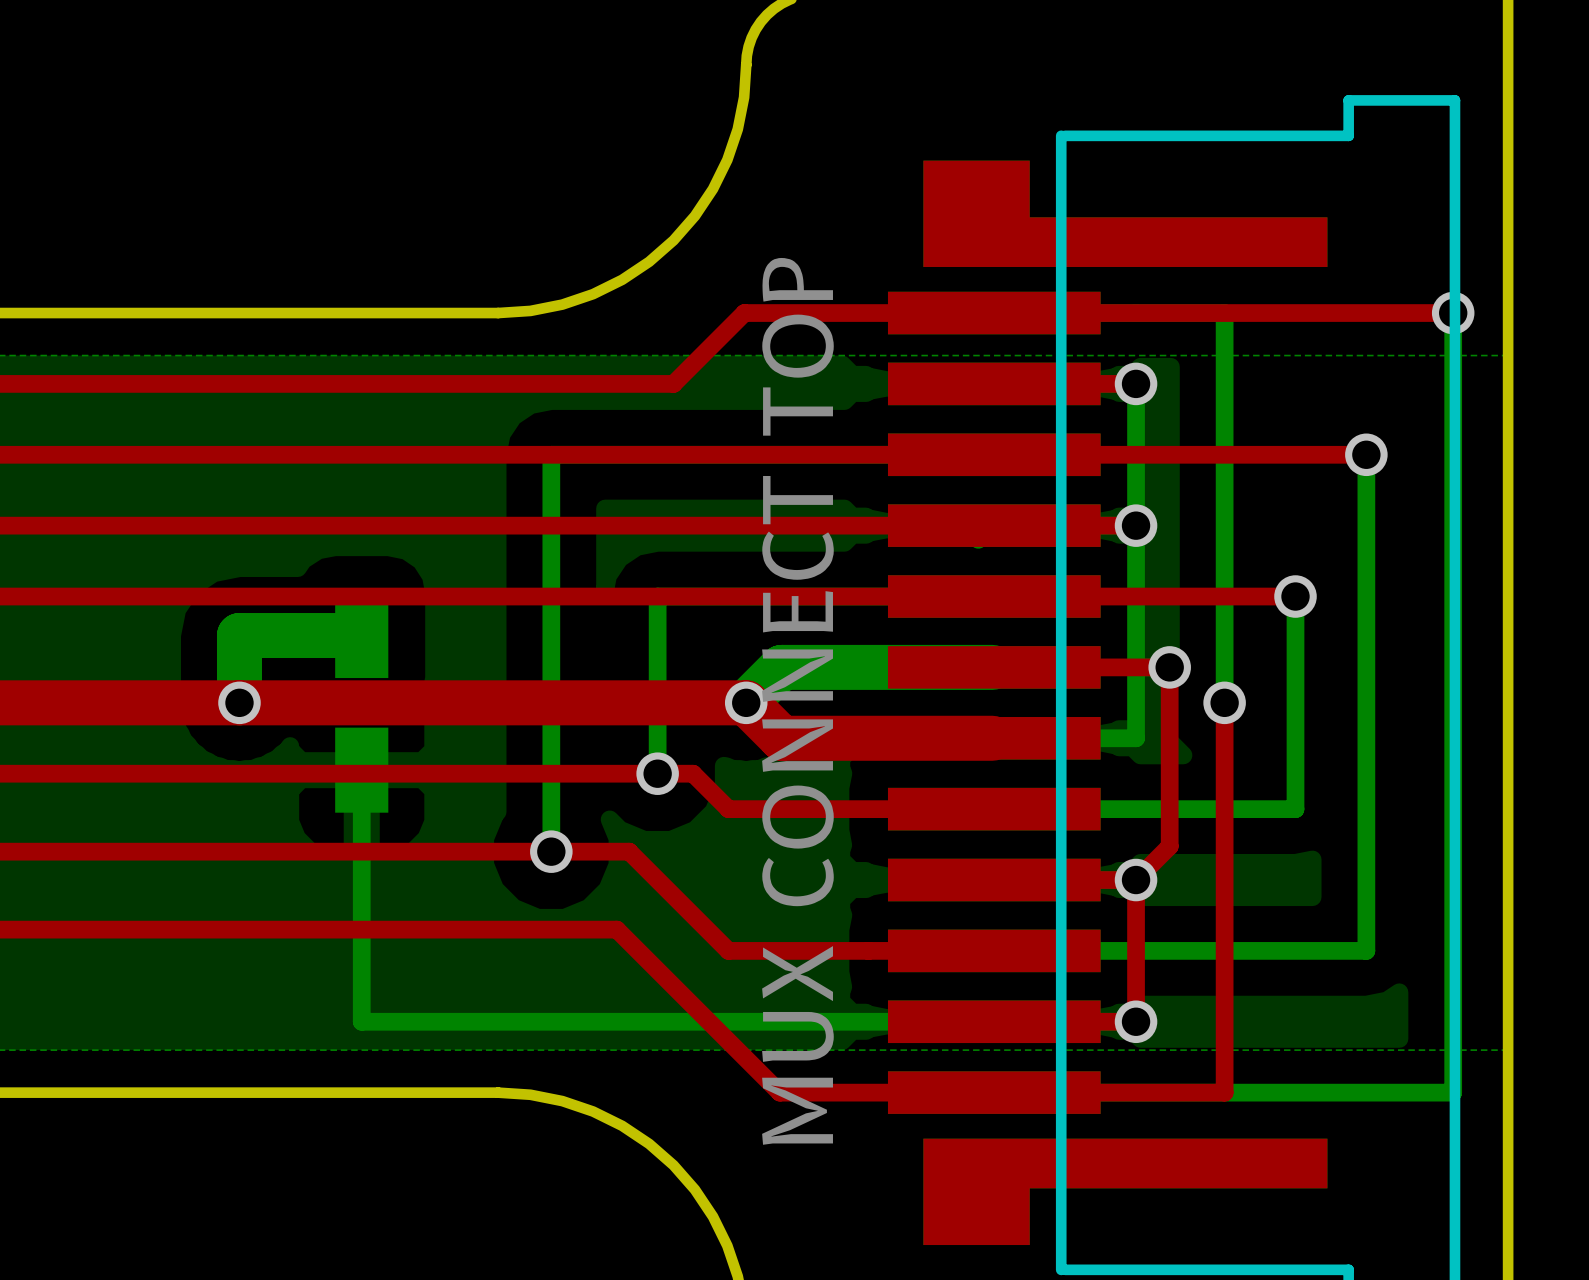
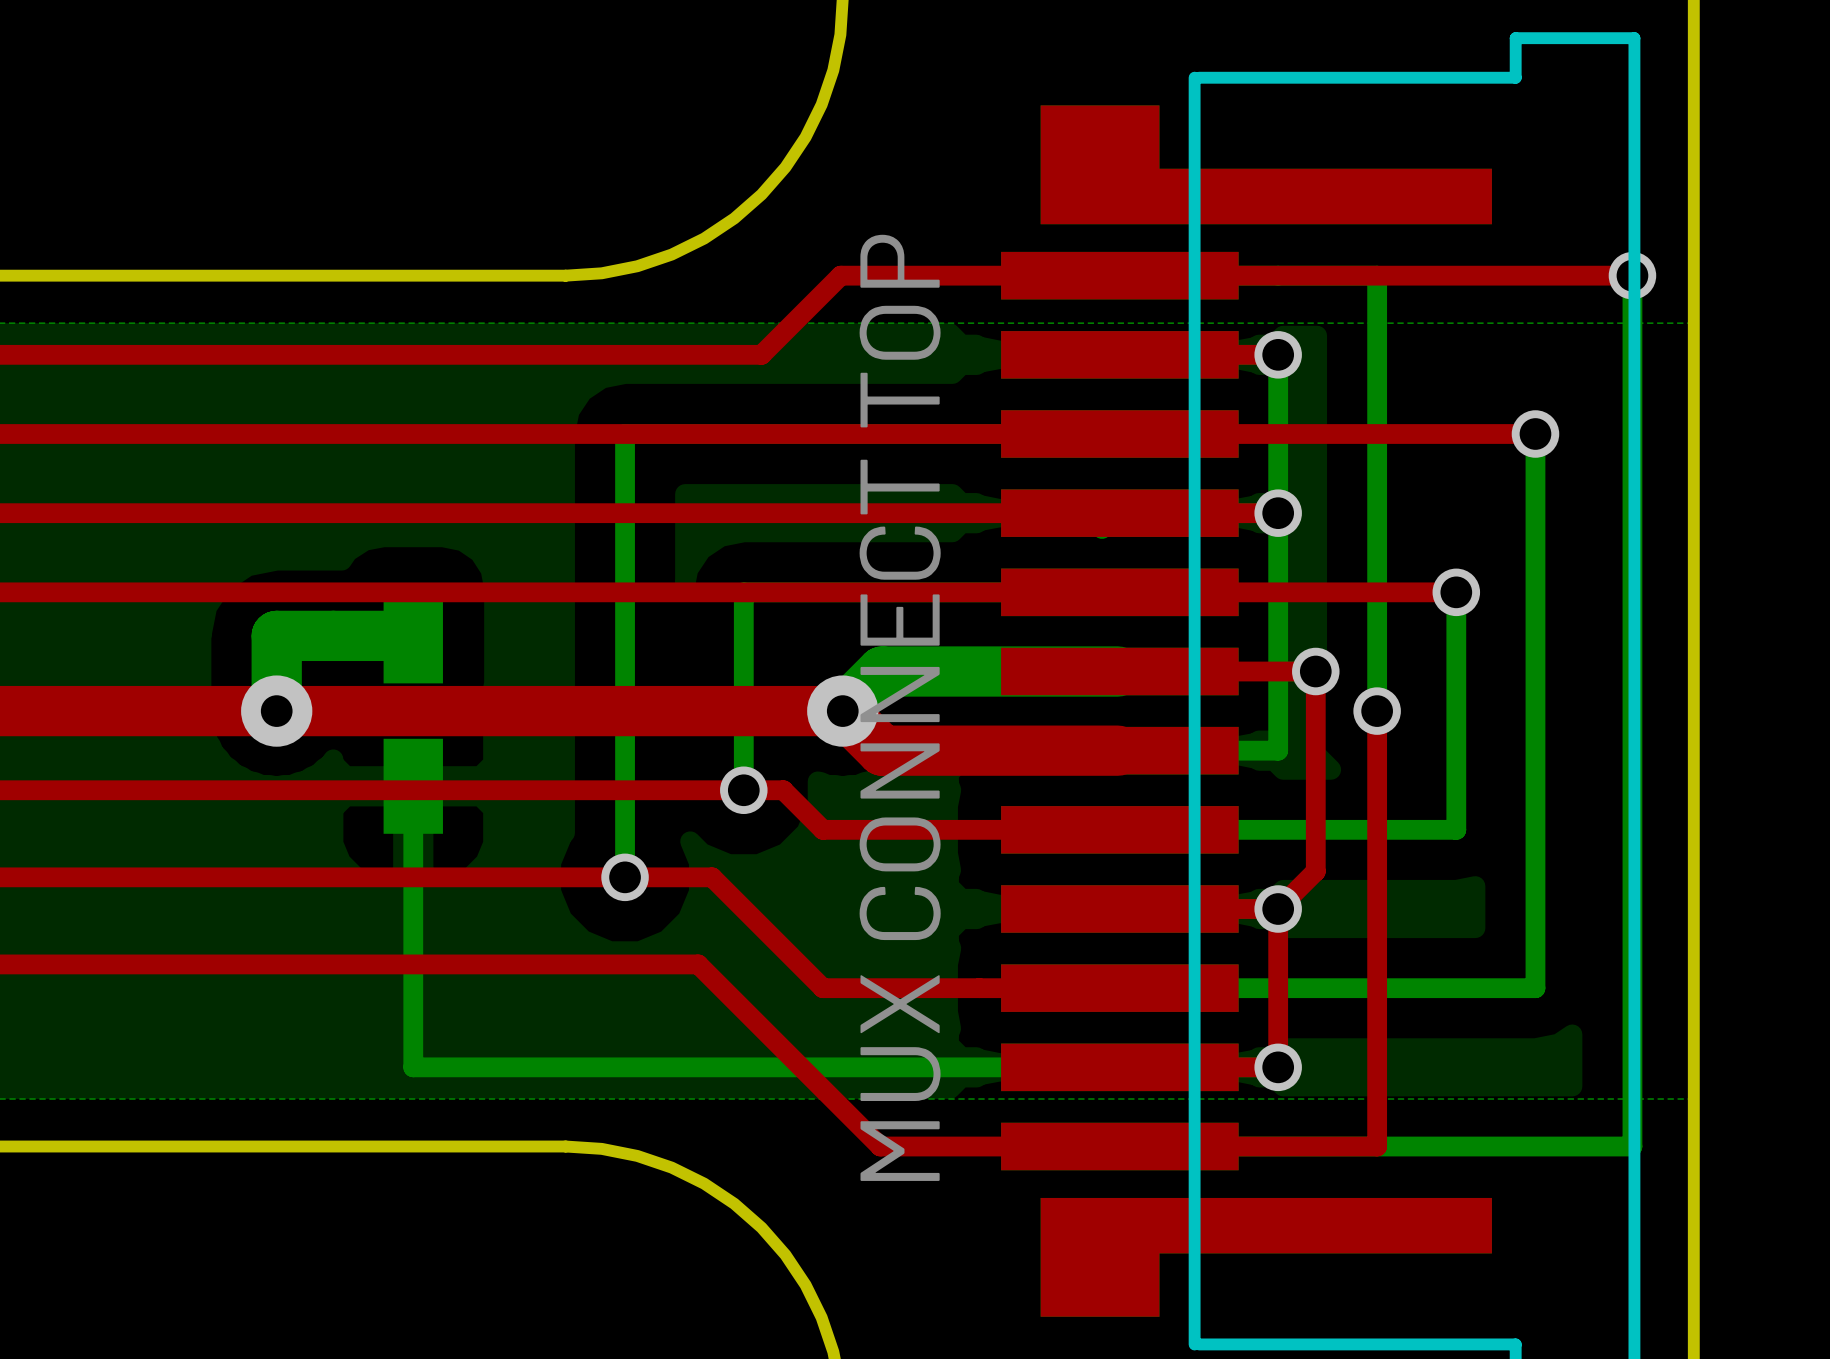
via size: [218, 681, 261, 725] -> [241, 675, 313, 747]
via size: [724, 681, 768, 725] -> [807, 675, 879, 747]

